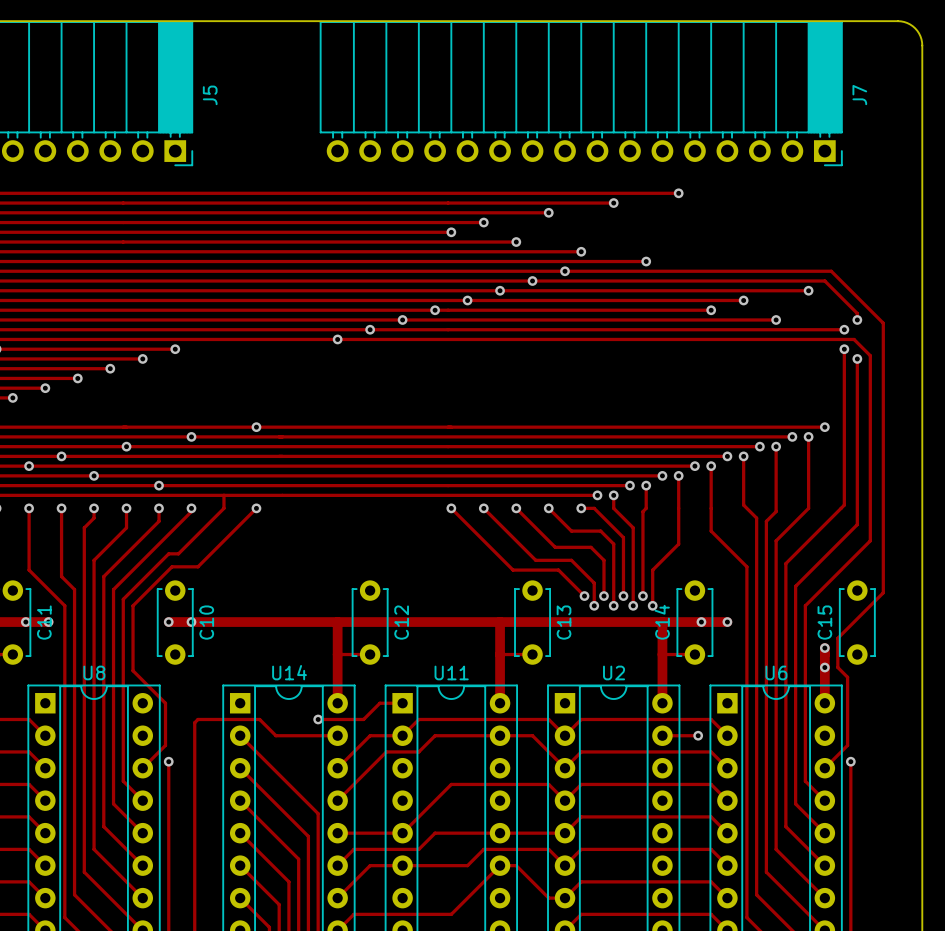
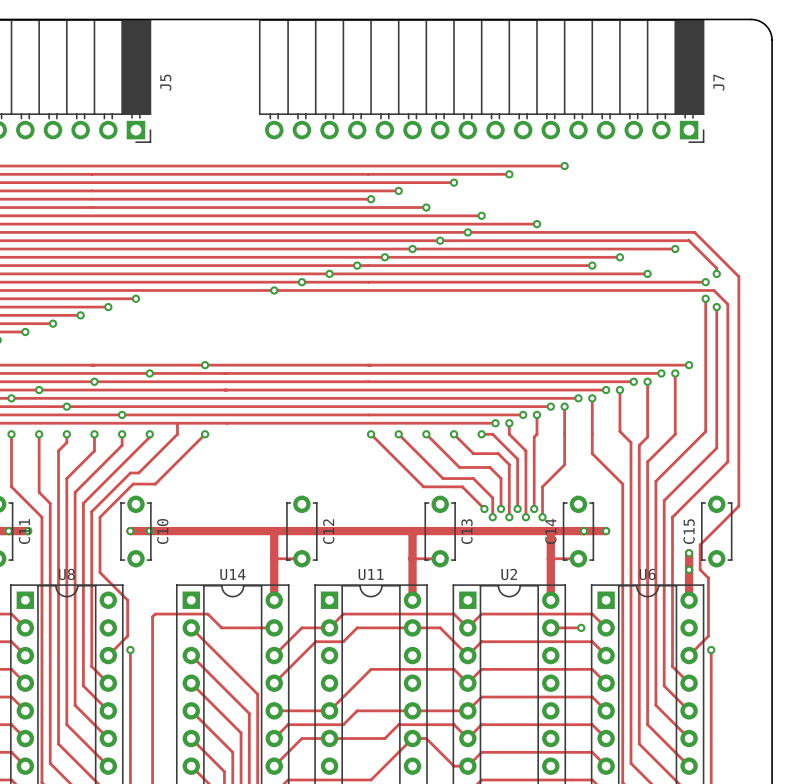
track: (402, 703) (379, 703) (363, 719) (318, 719) -> none
via: (318, 719) -> none

